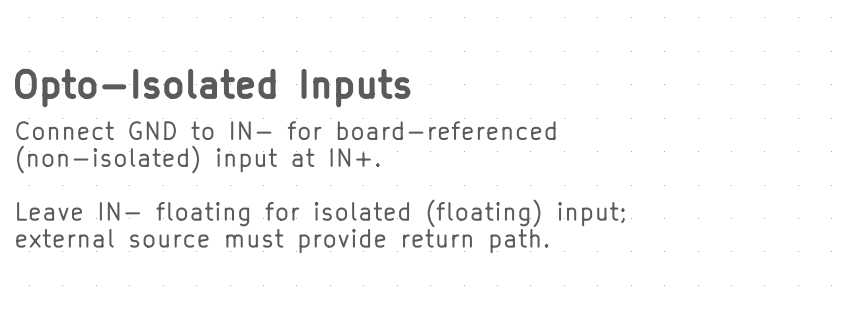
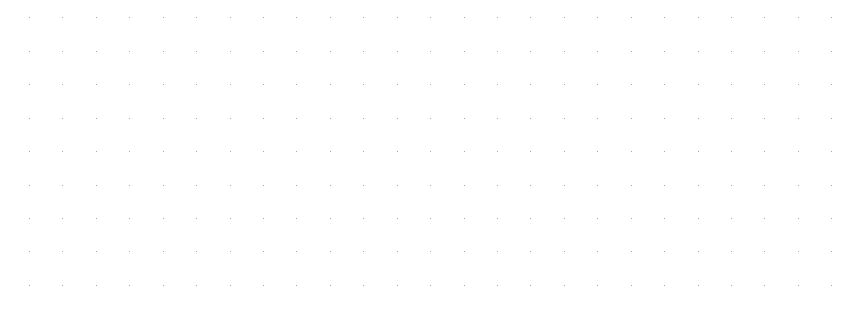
text: Opto-Isolated Inputs (212, 88) -> none
text: Connect GND to IN− for board-referenced (285, 130) -> none
text: (non-isolated) input at IN+. (198, 159) -> none
text: Leave IN− floating for isolated (floating) input; (320, 213) -> none
text: external source must provide return path. (282, 241) -> none

